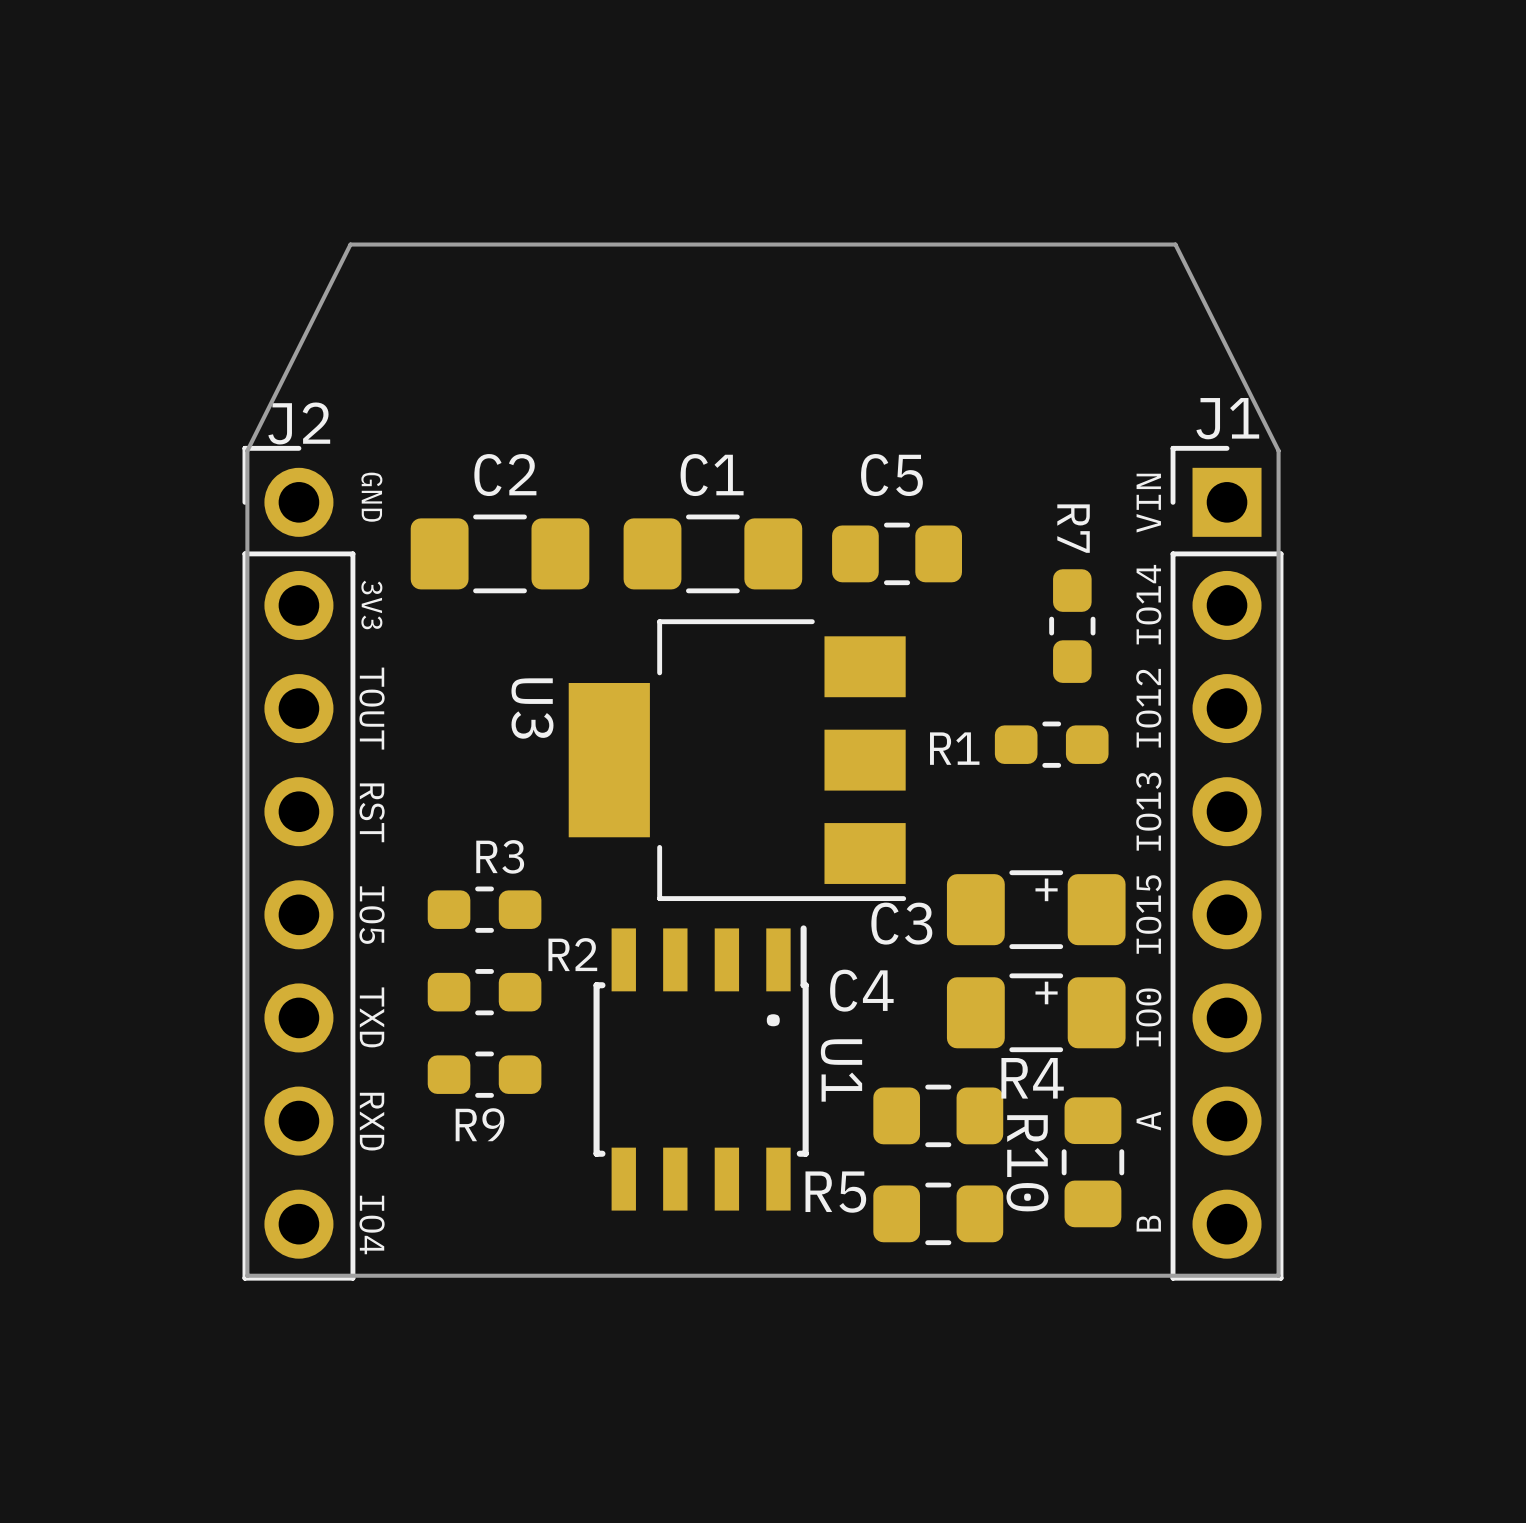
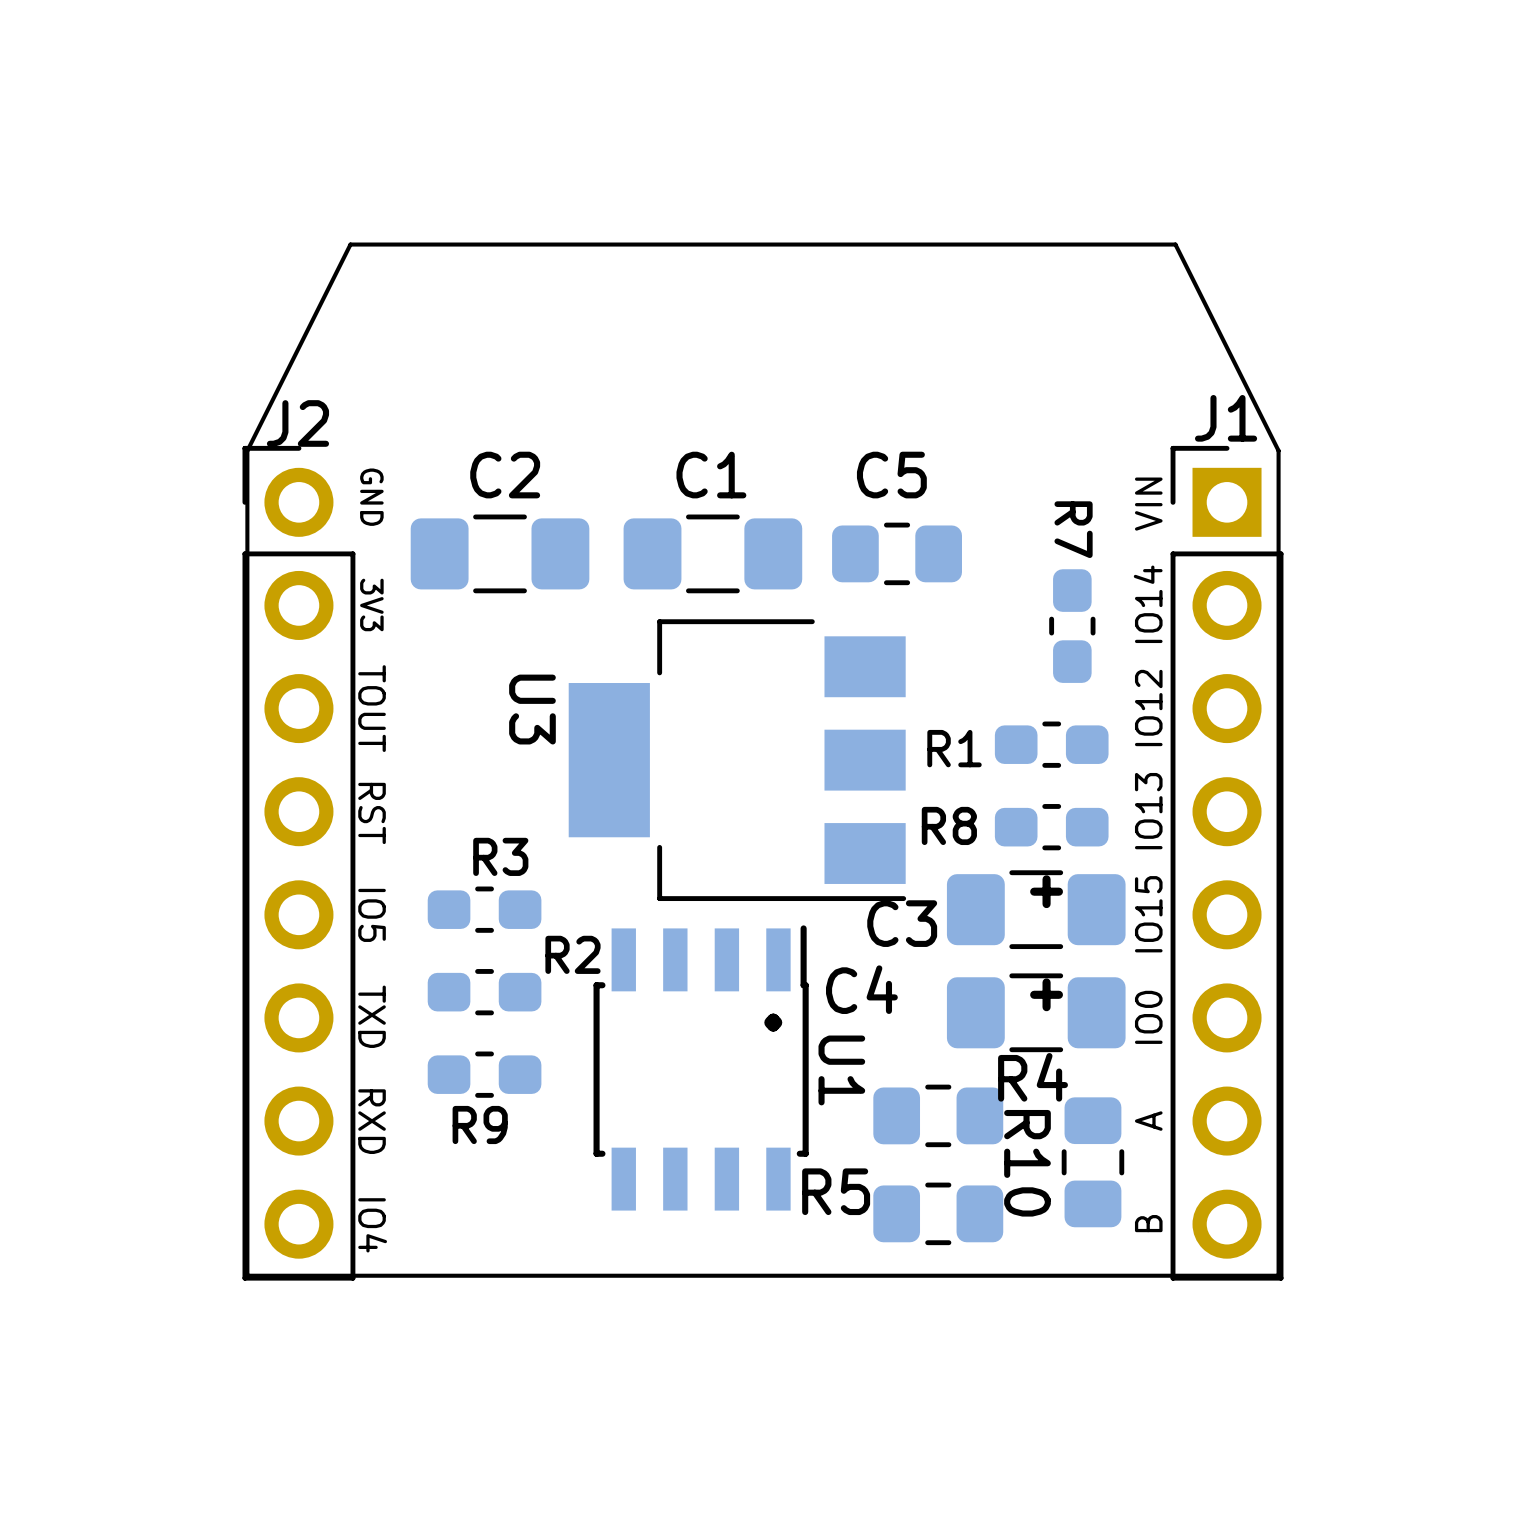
R8: none -> (1051, 827)

